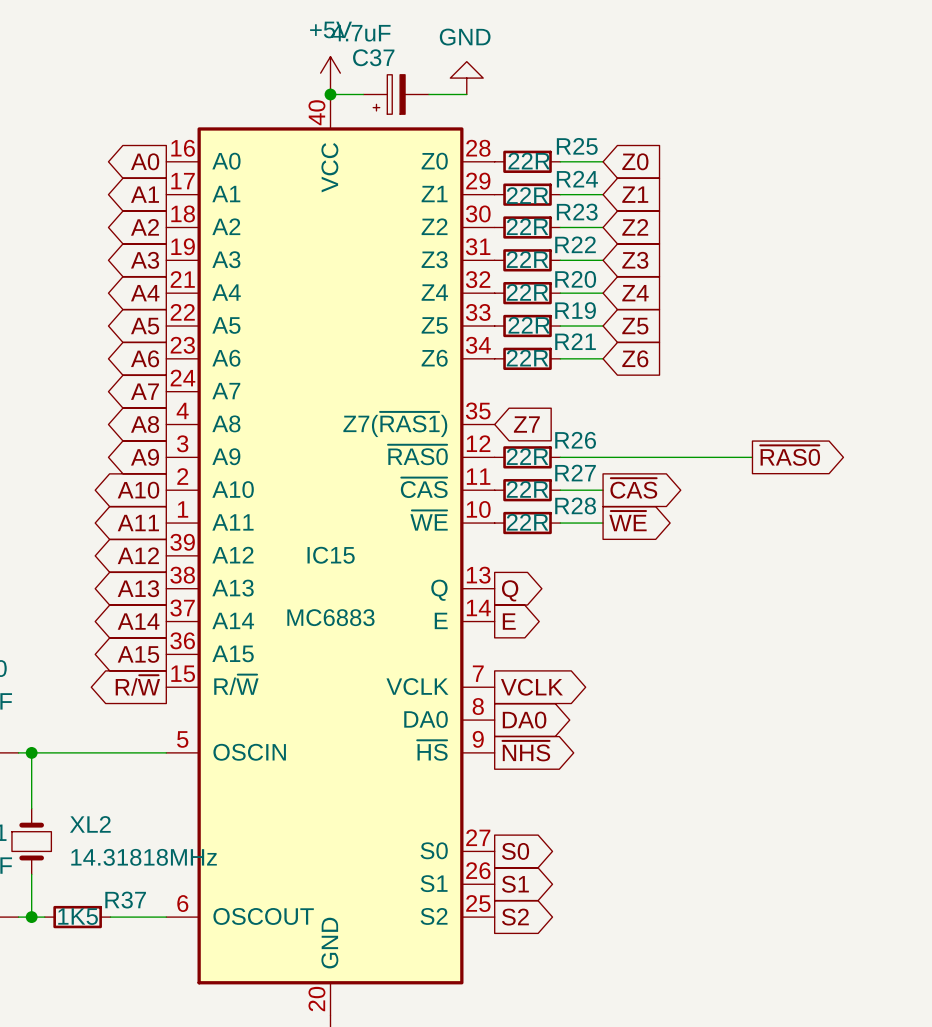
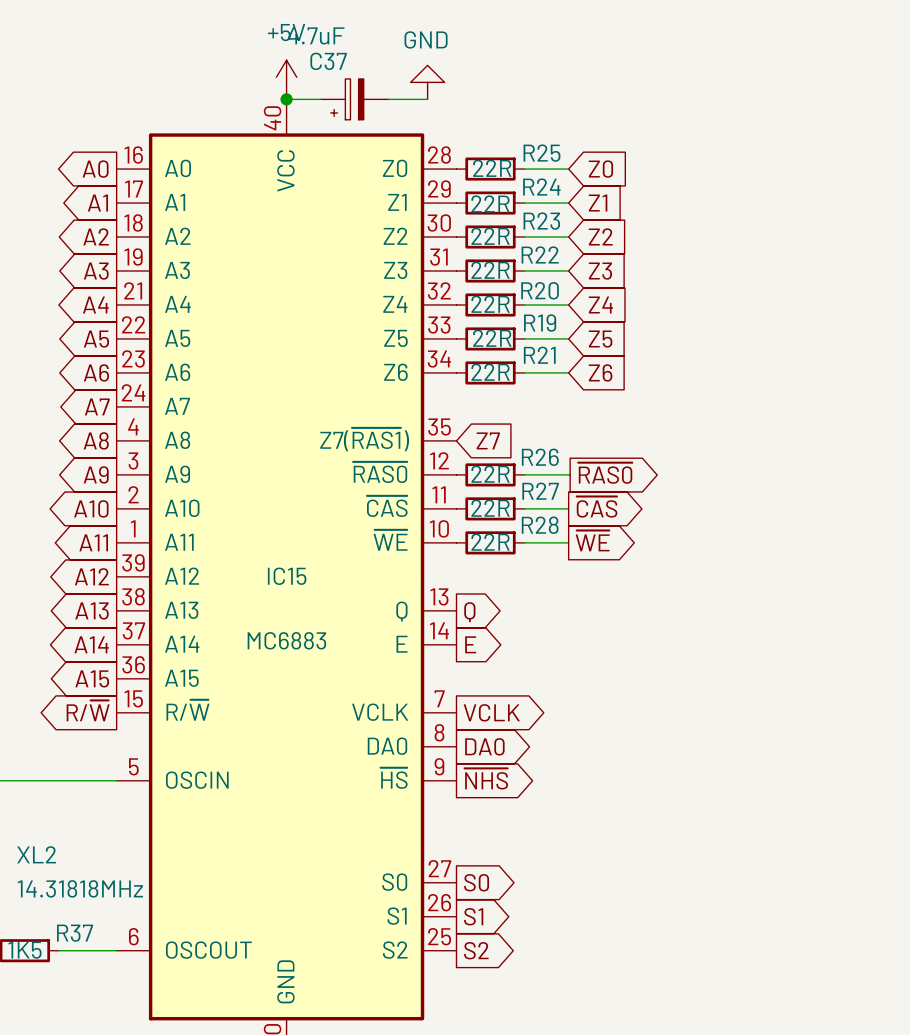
global label position: ~{RAS0} (790, 455) -> ~{RAS0} (605, 473)
wire: (604, 457) (752, 457) -> none

